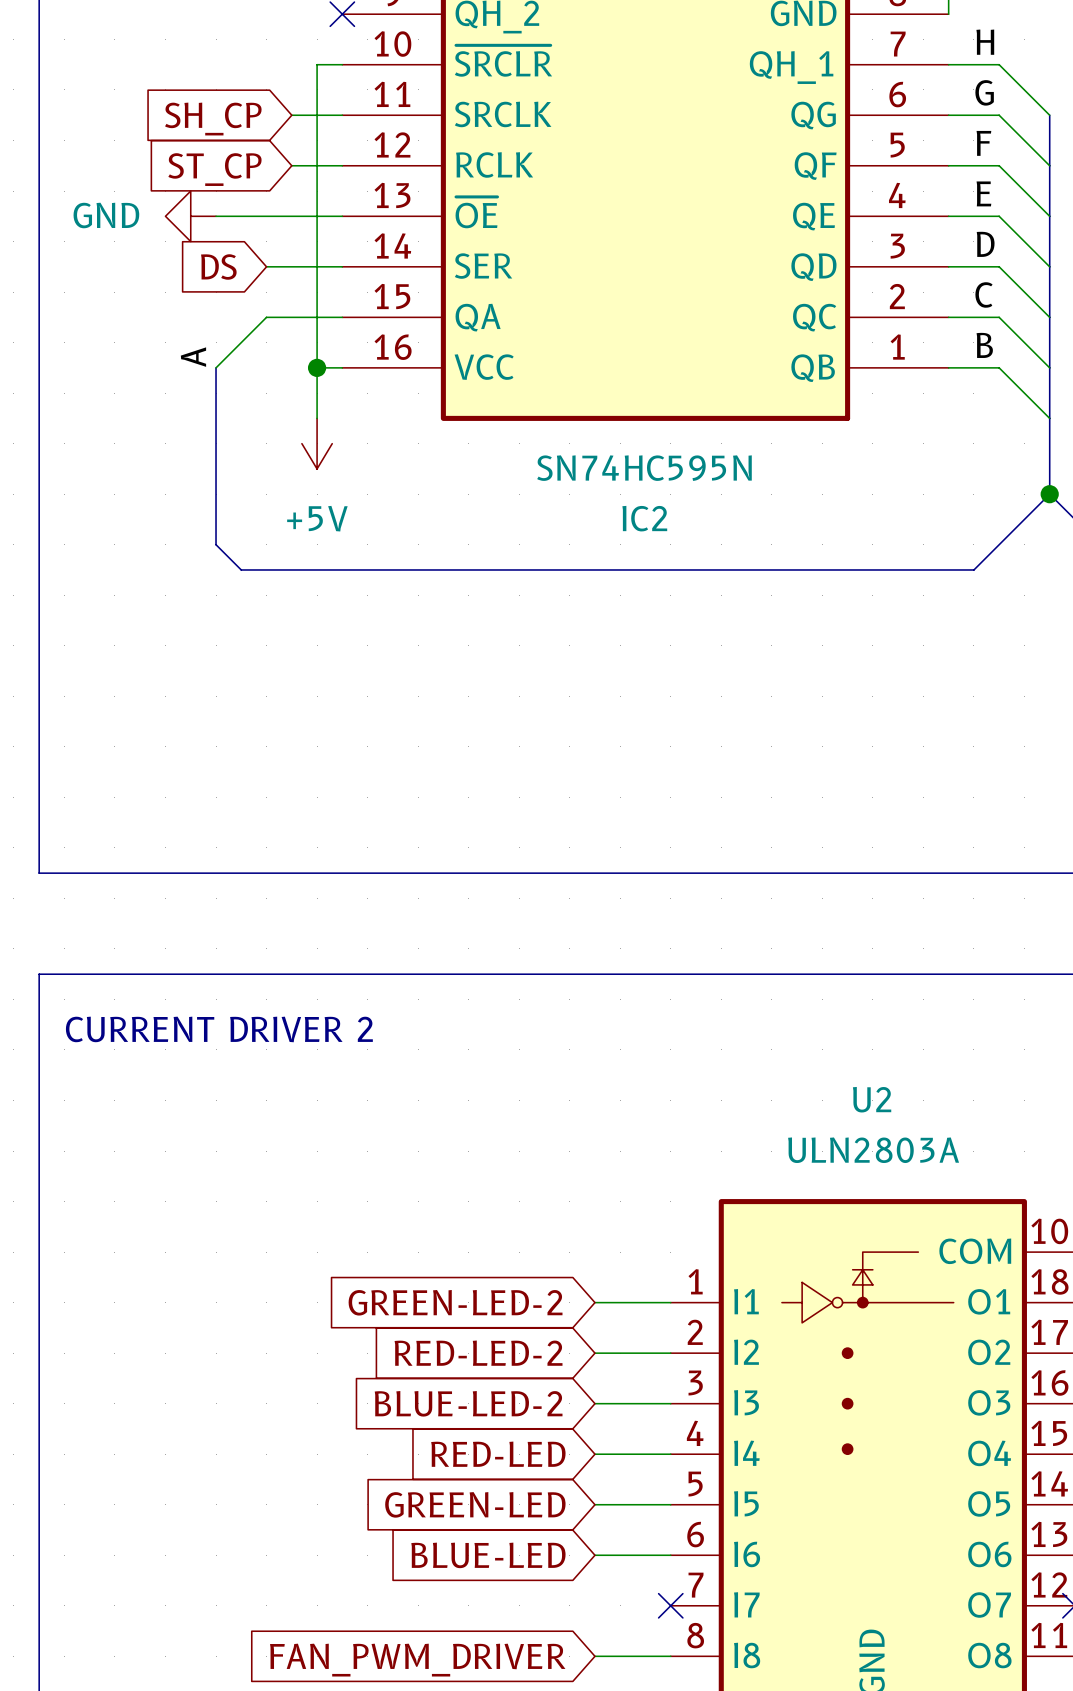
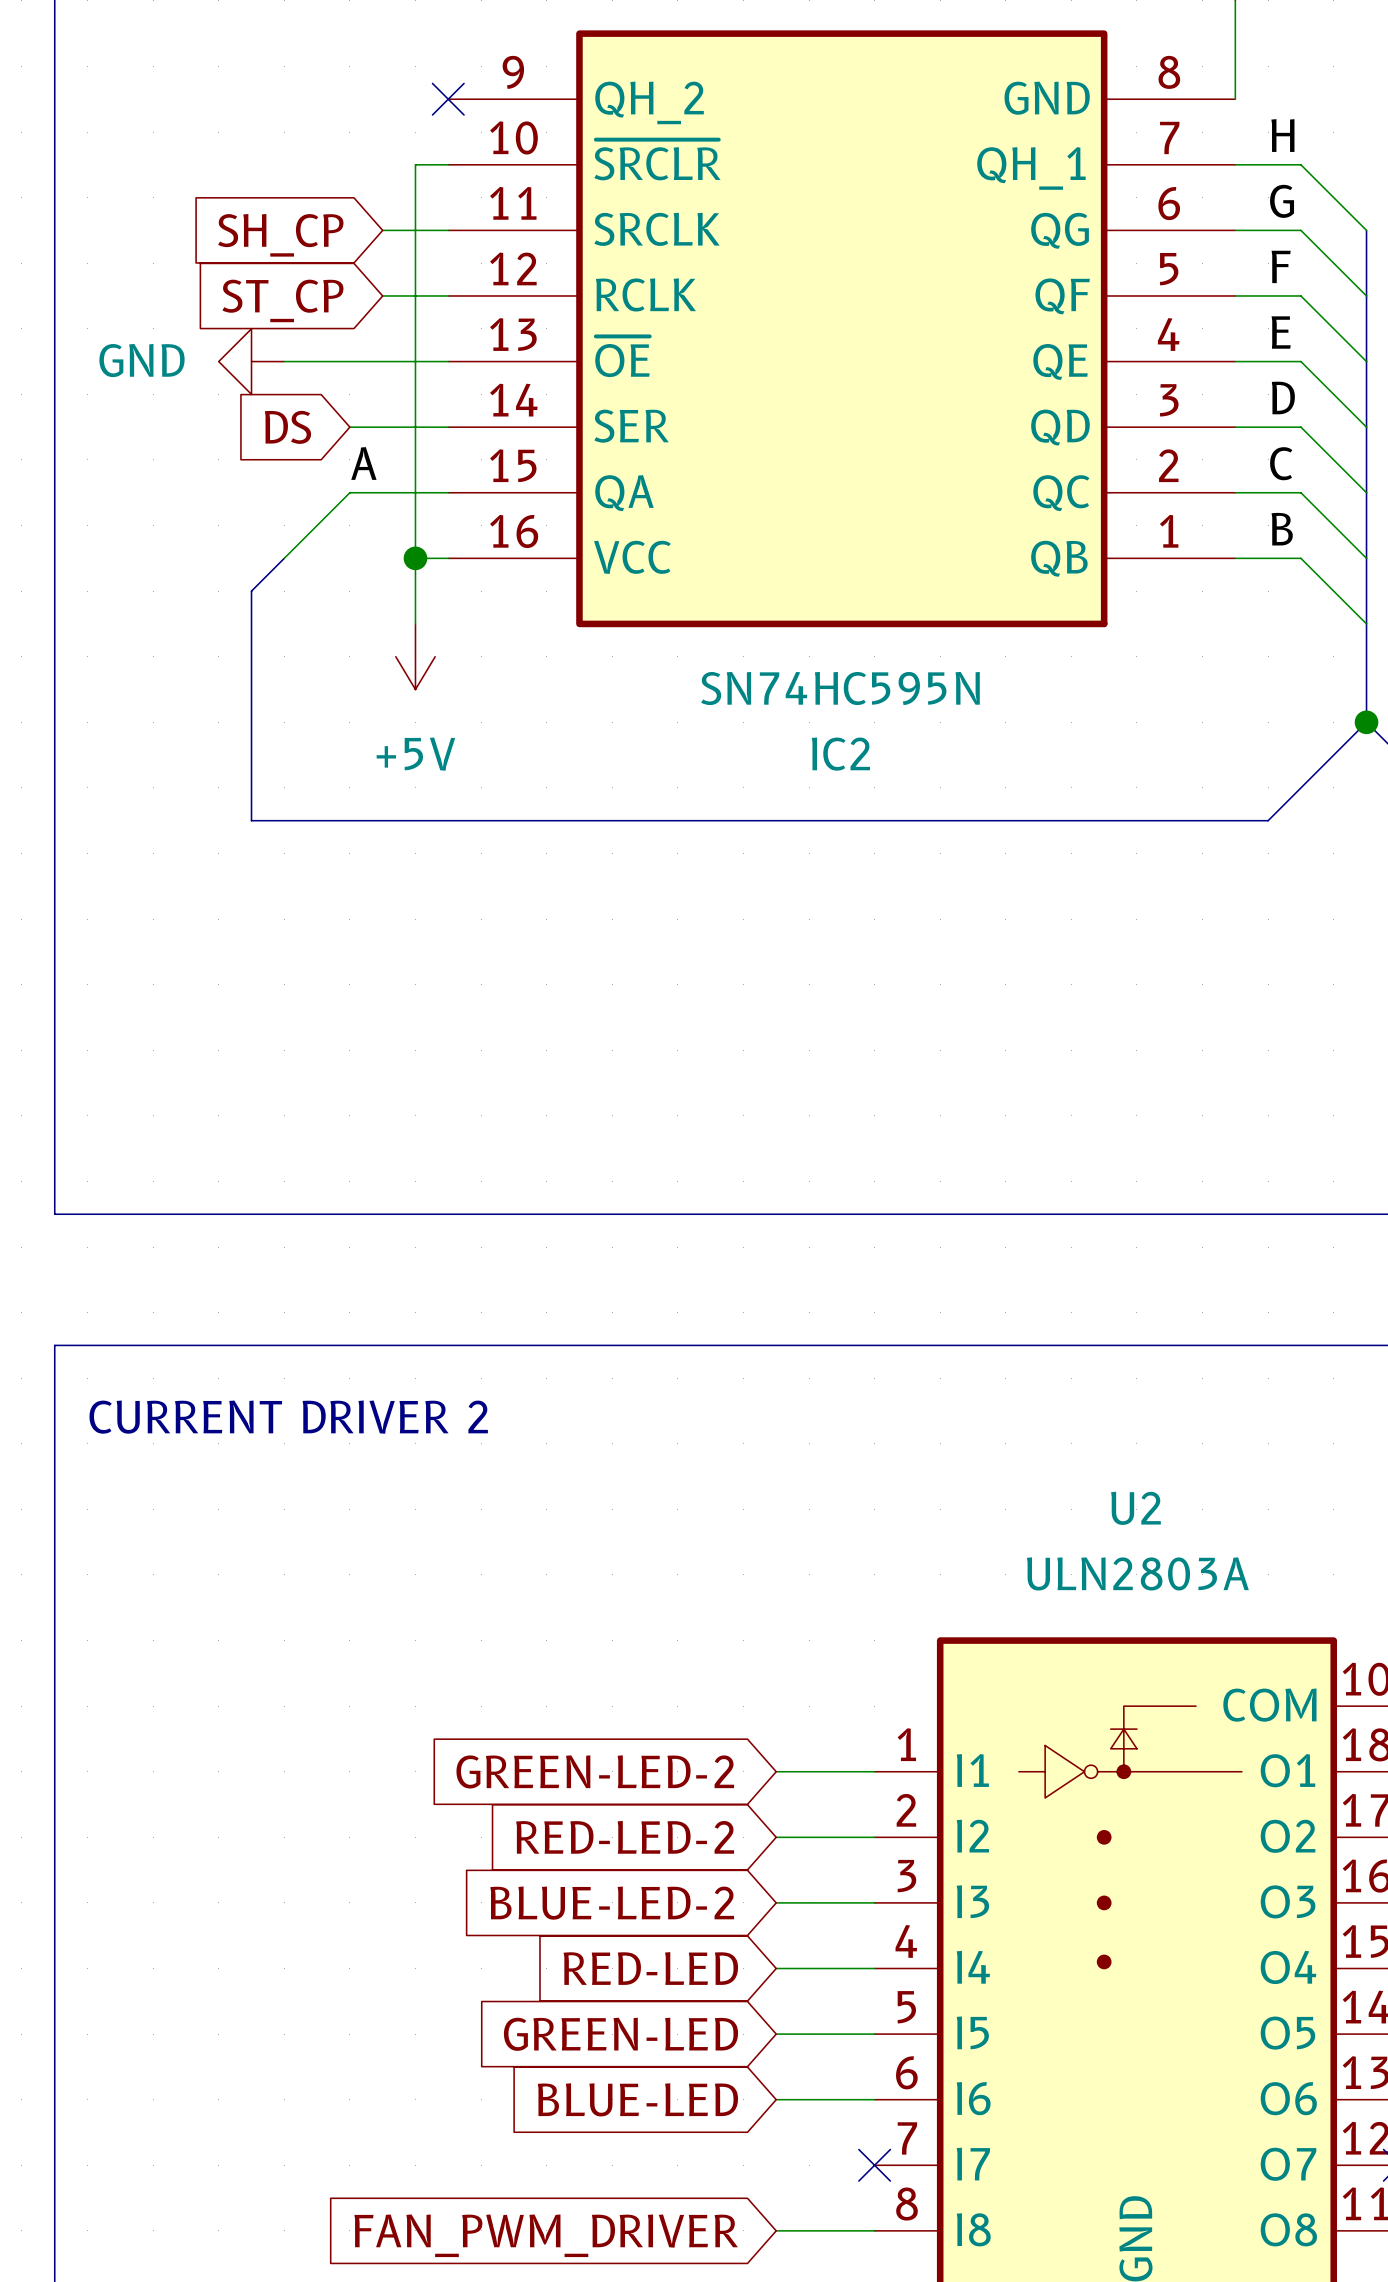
label rotation: 0° (193, 357) -> 90° clockwise (363, 463)
label position: A (193, 357) -> A (363, 463)
bus: (216, 367) (216, 544) (241, 569) -> (284, 558) (251, 591) (251, 820) (317, 820)

